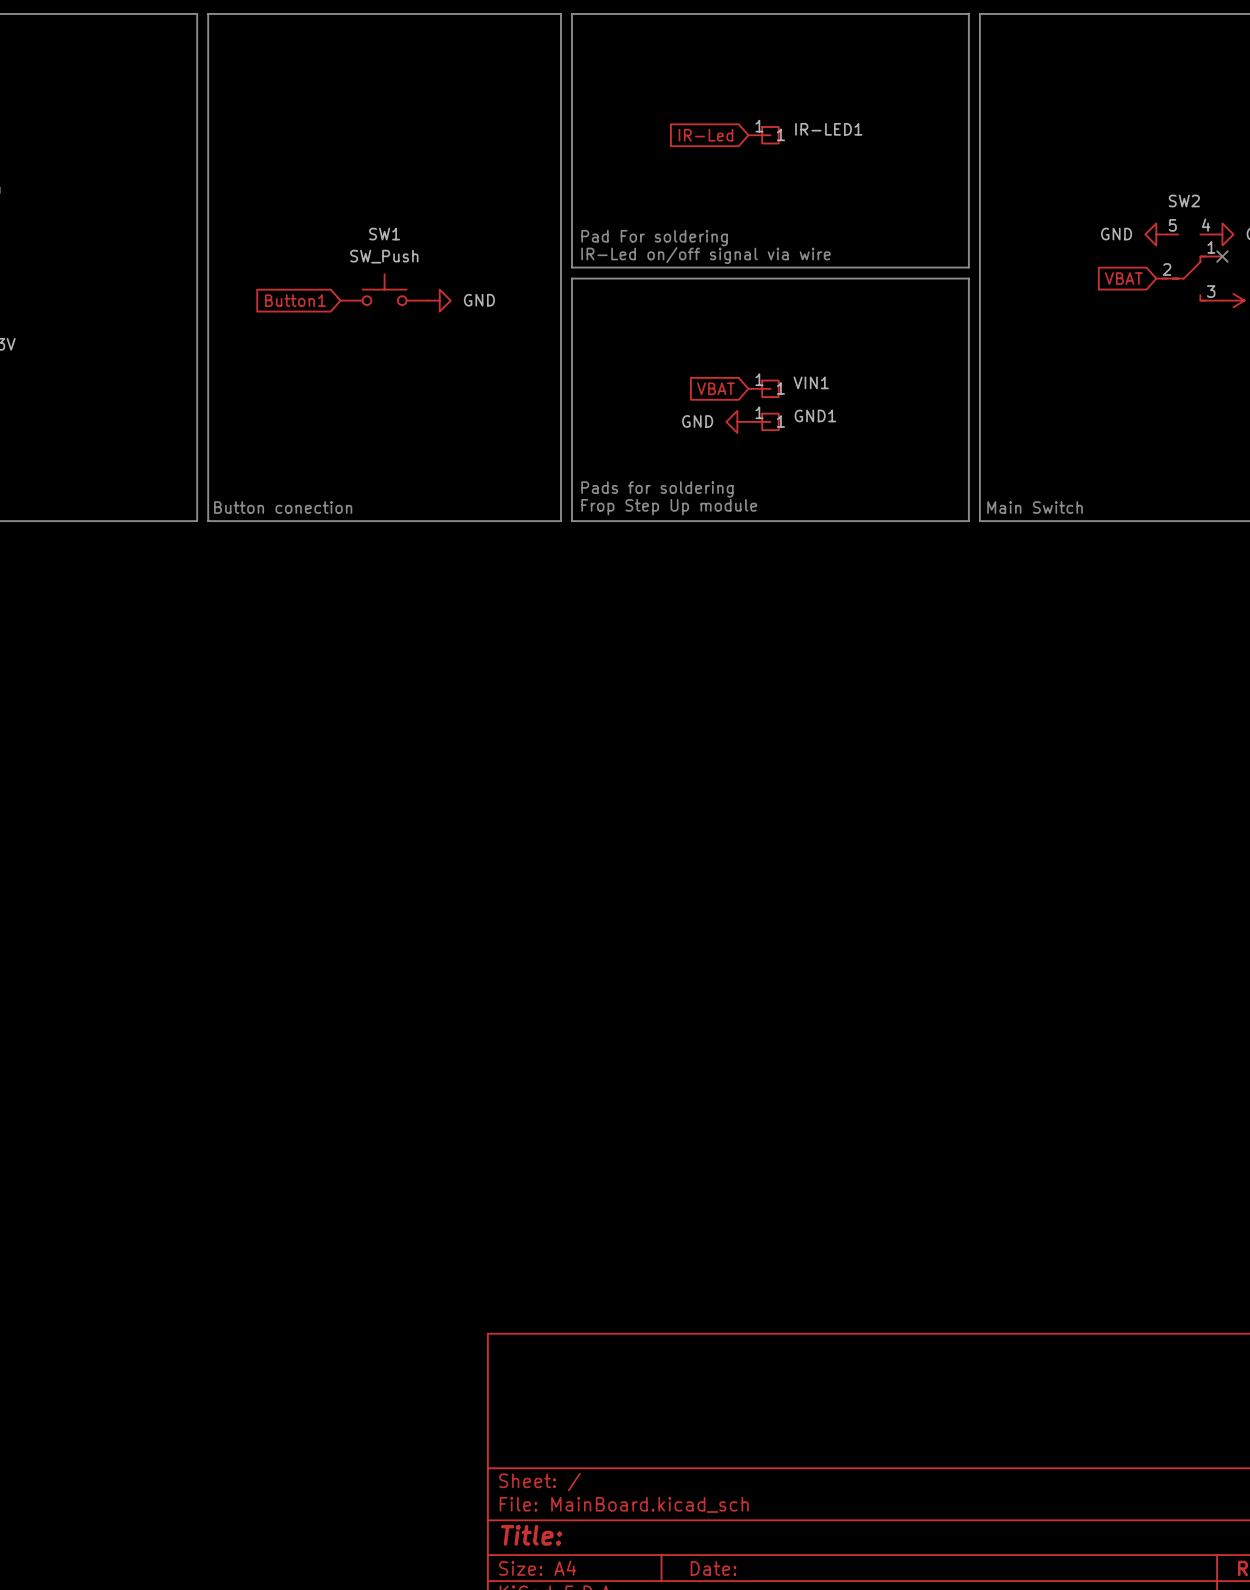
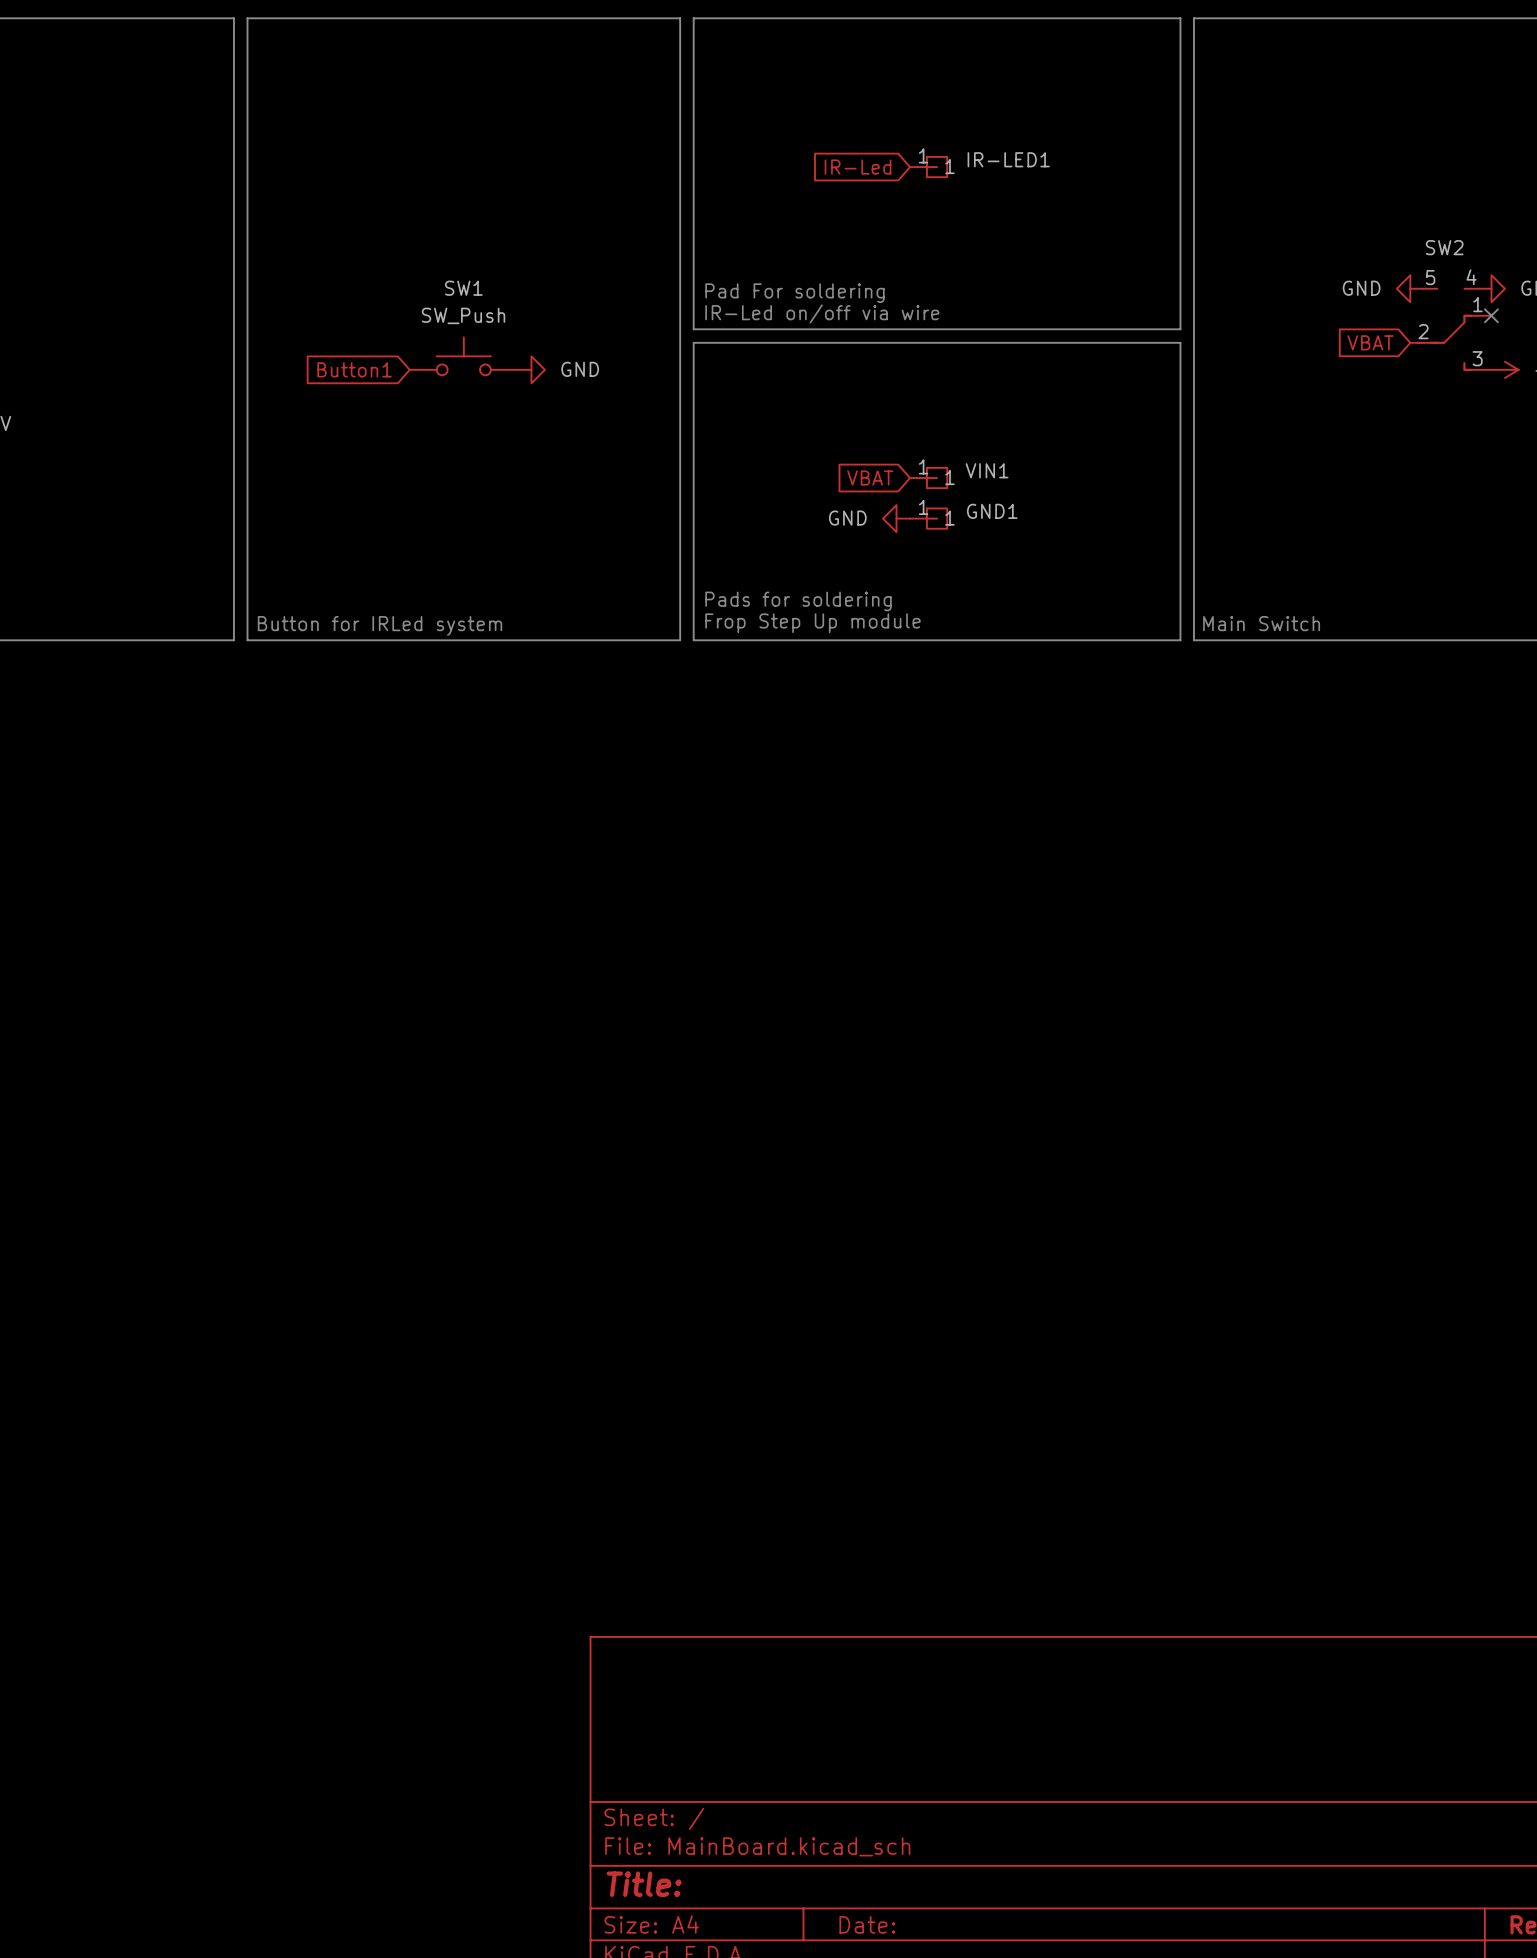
text: IR-Led on/off signal via wire (706, 255) -> IR-Led on/off via wire (822, 313)
text: Button conection (283, 507) -> none
text: none -> Button for IRLed system (380, 625)

